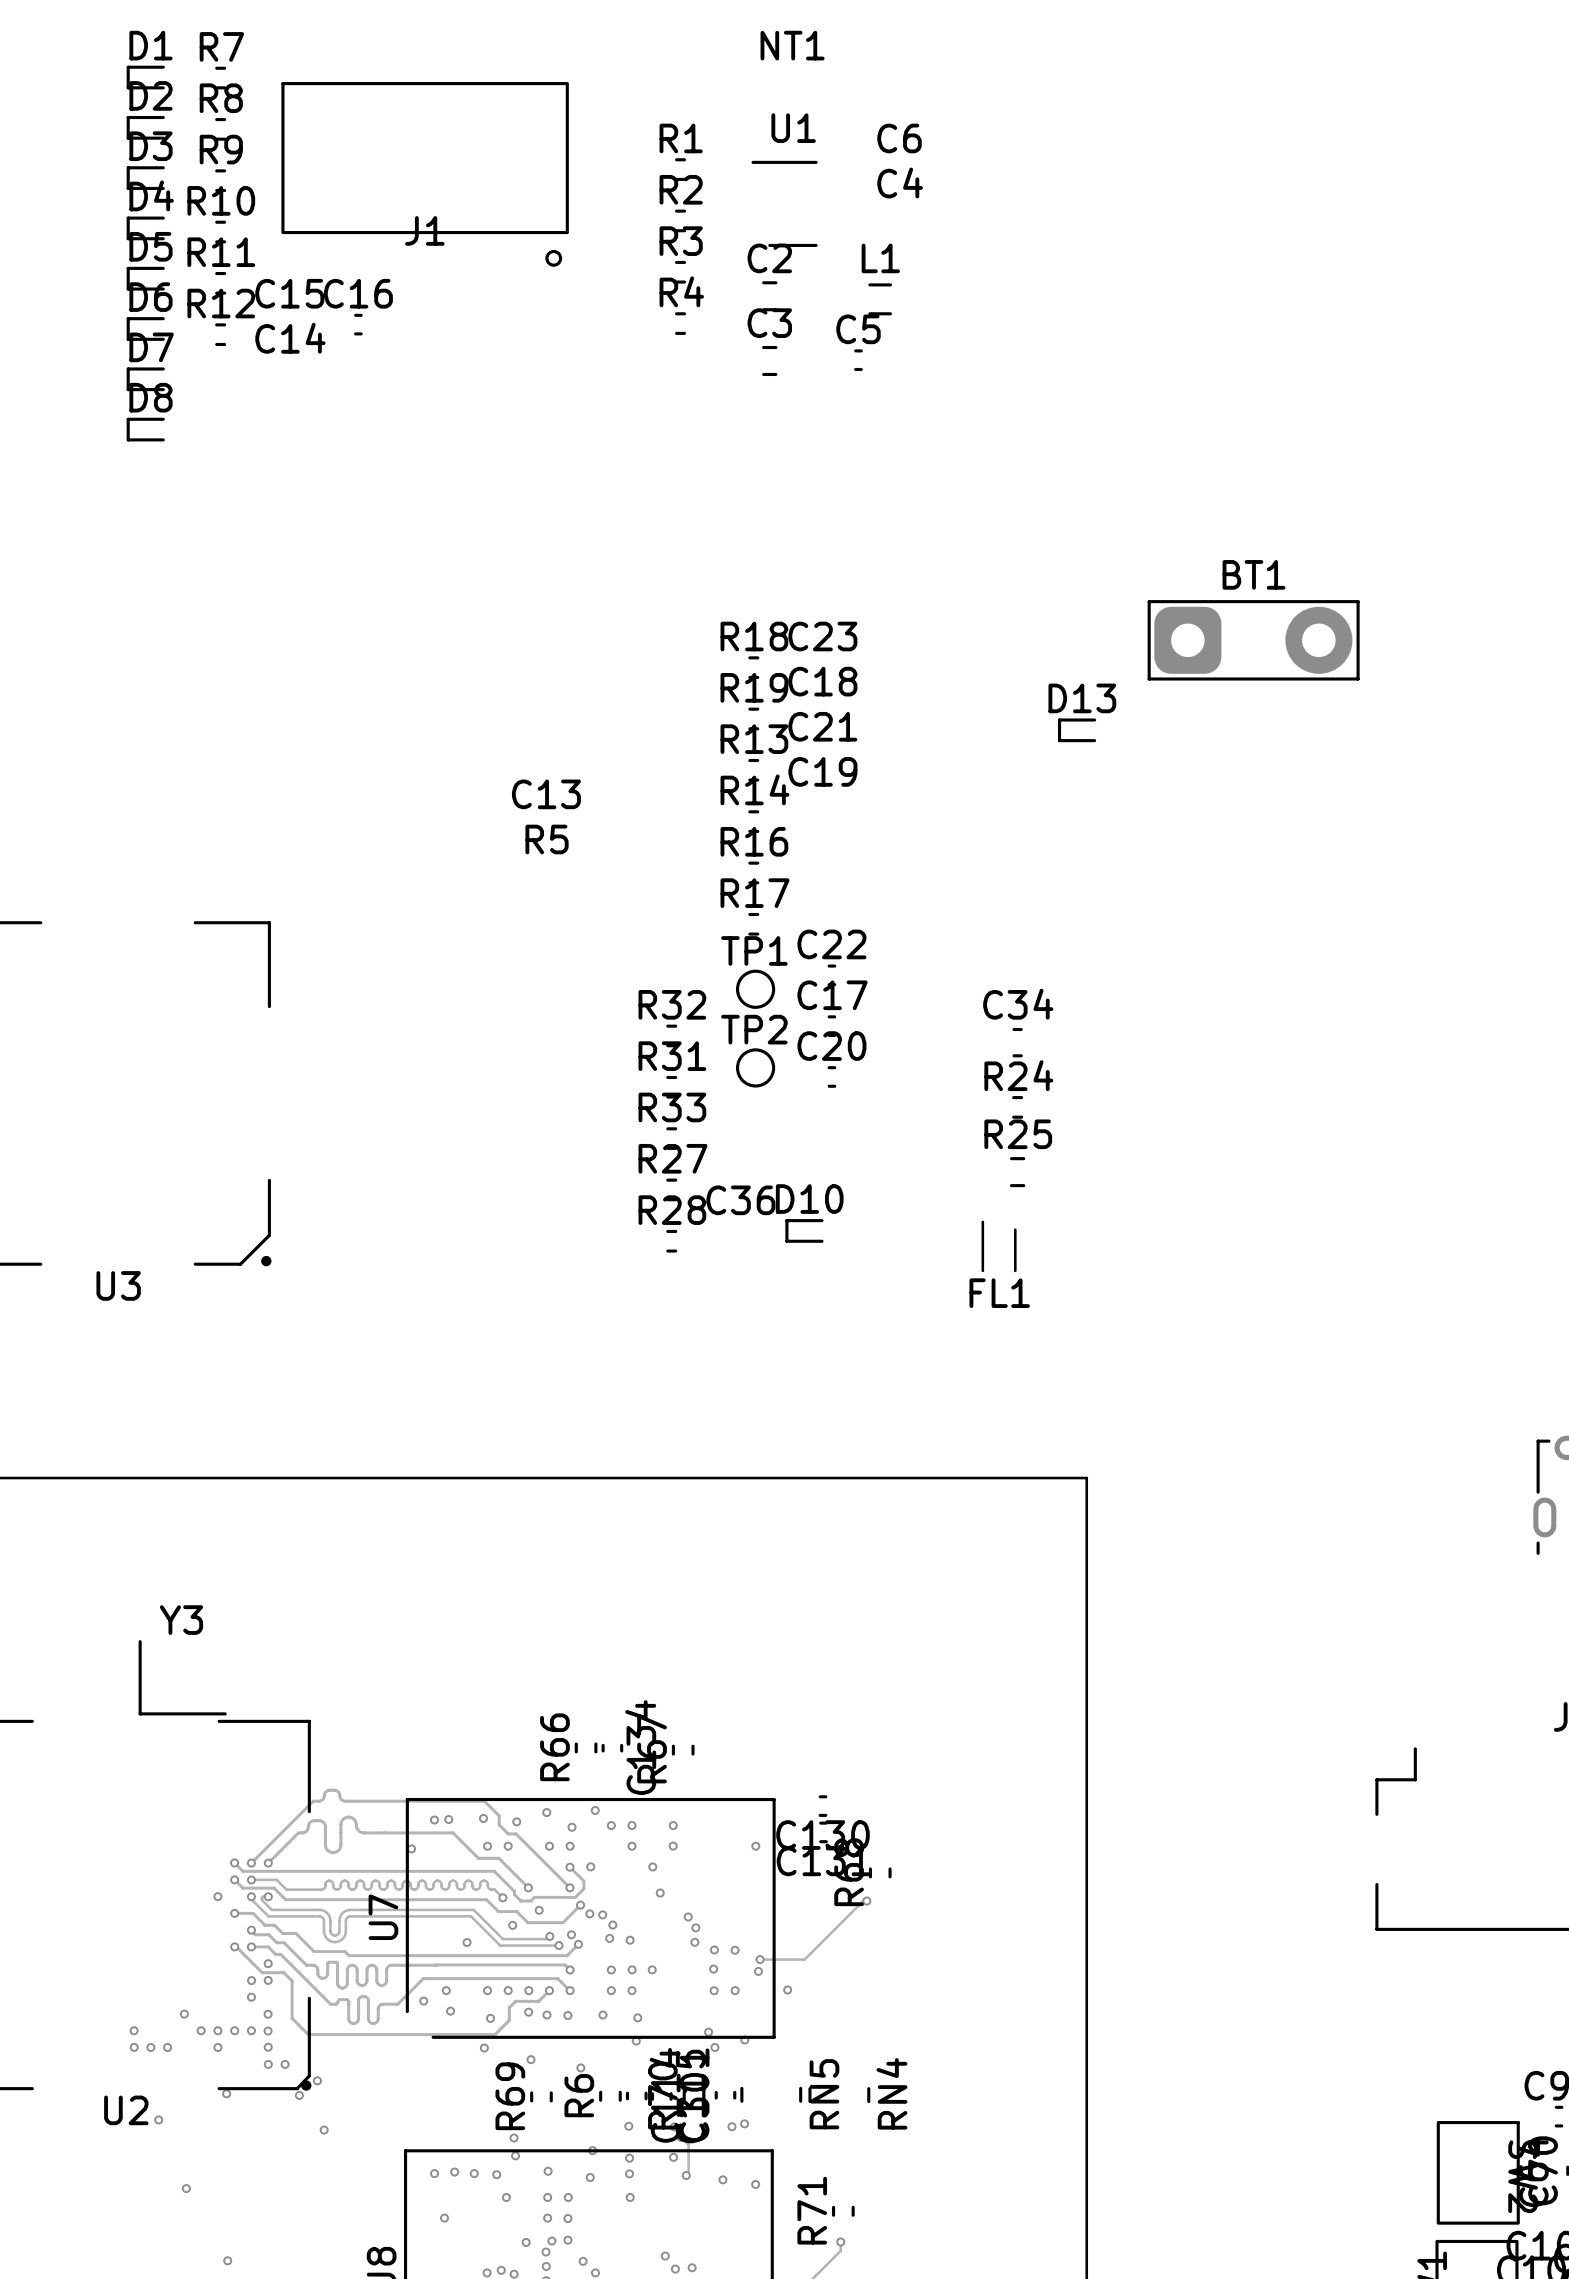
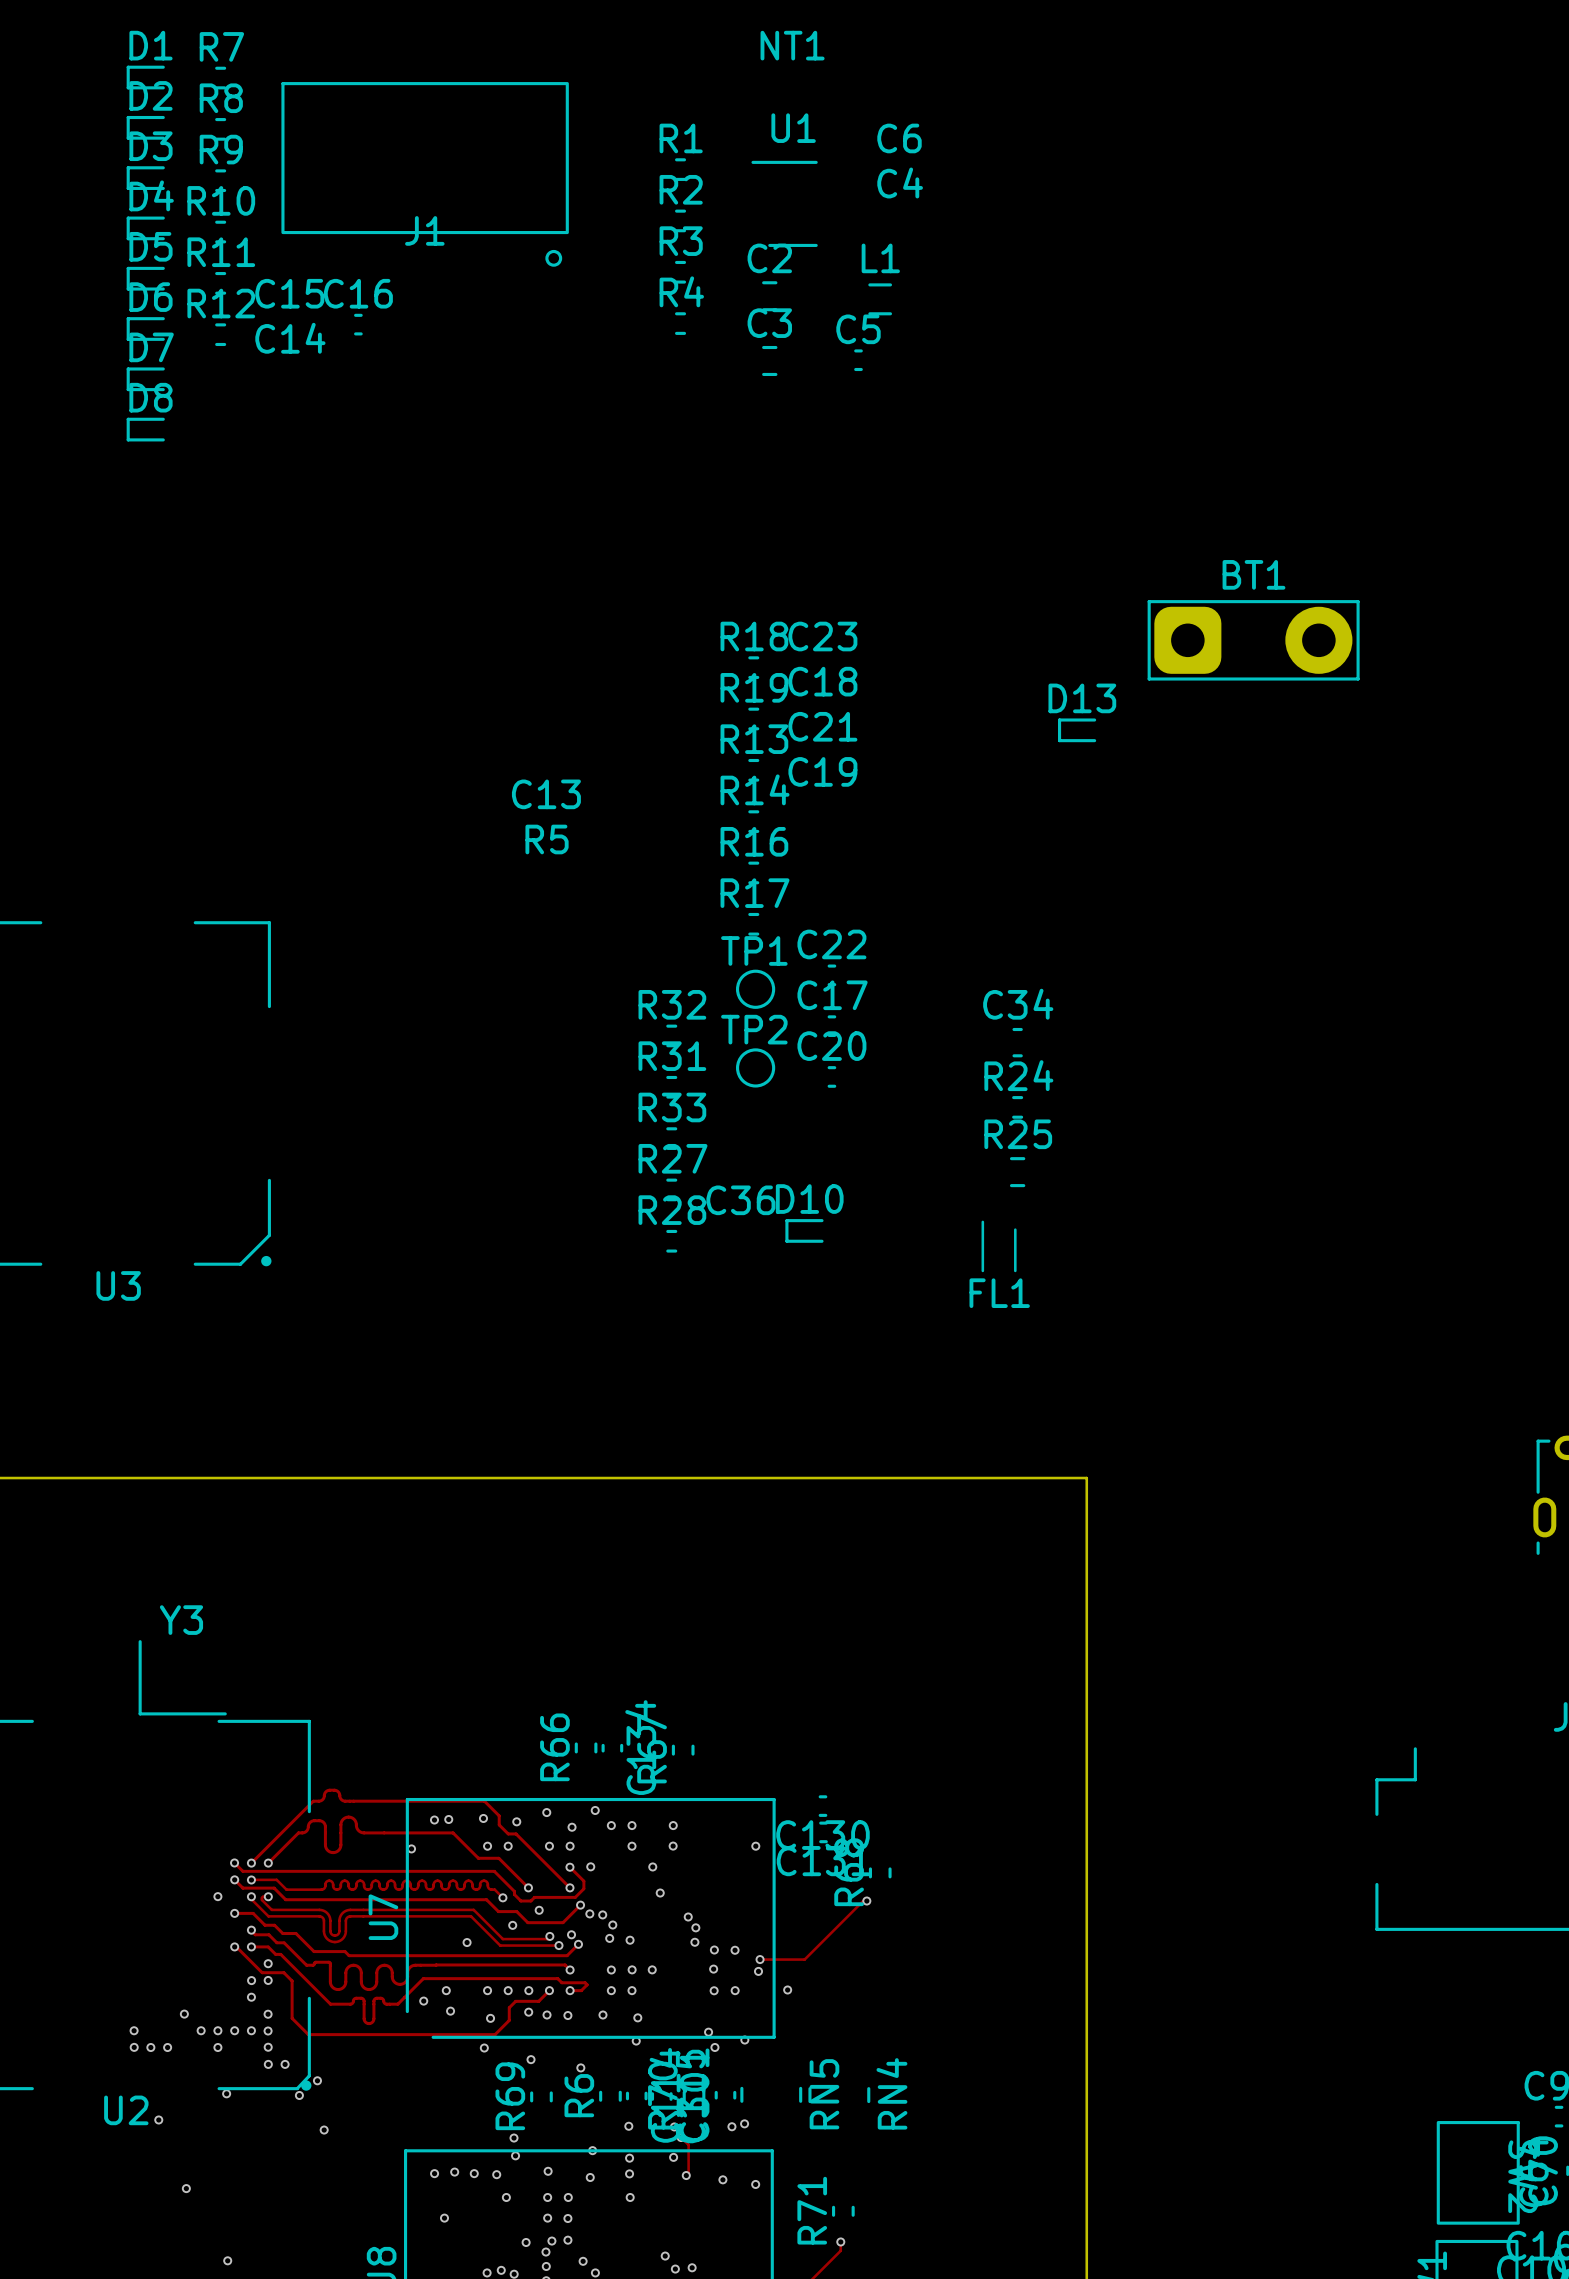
track: (312, 1965) (317, 1968) (318, 1976) (323, 1978) (327, 1975) (328, 1962) (336, 1962) (337, 1984) (341, 1988) (347, 1984) (347, 1969) (350, 1965) (356, 1968) (357, 1981) (360, 1985) (366, 1982) (368, 1966) (374, 1966) (376, 1972) -> (312, 1965) (315, 1962) (329, 1962) (330, 1983) (336, 1989) (341, 1988) (344, 1985) (346, 1970) (351, 1965) (356, 1965) (360, 1969) (361, 1983) (365, 1988) (373, 1987) (376, 1980)
track: (415, 1965) (389, 1965) (386, 1969) (385, 1983) (380, 1985) (376, 1980) -> (415, 1965) (409, 1968) (407, 1979) (401, 1984) (393, 1981) (391, 1970) (387, 1965) (380, 1966) (376, 1972)
track: (561, 1982) (570, 1990) -> (561, 1982) (585, 1982) (587, 1984) (581, 1990) (570, 1990)
track: (335, 2004) (339, 1999) (348, 2000) (349, 2020) (354, 2023) (358, 2019) (358, 1999) (361, 1996) (366, 1997) (368, 1999) (368, 2019) (373, 2023) (377, 2020) (378, 2006) (386, 2004) -> (335, 2004) (351, 2004) (355, 1998) (362, 1998) (364, 2019) (369, 2023) (373, 2019) (374, 1999) (381, 1998) (386, 2004)

